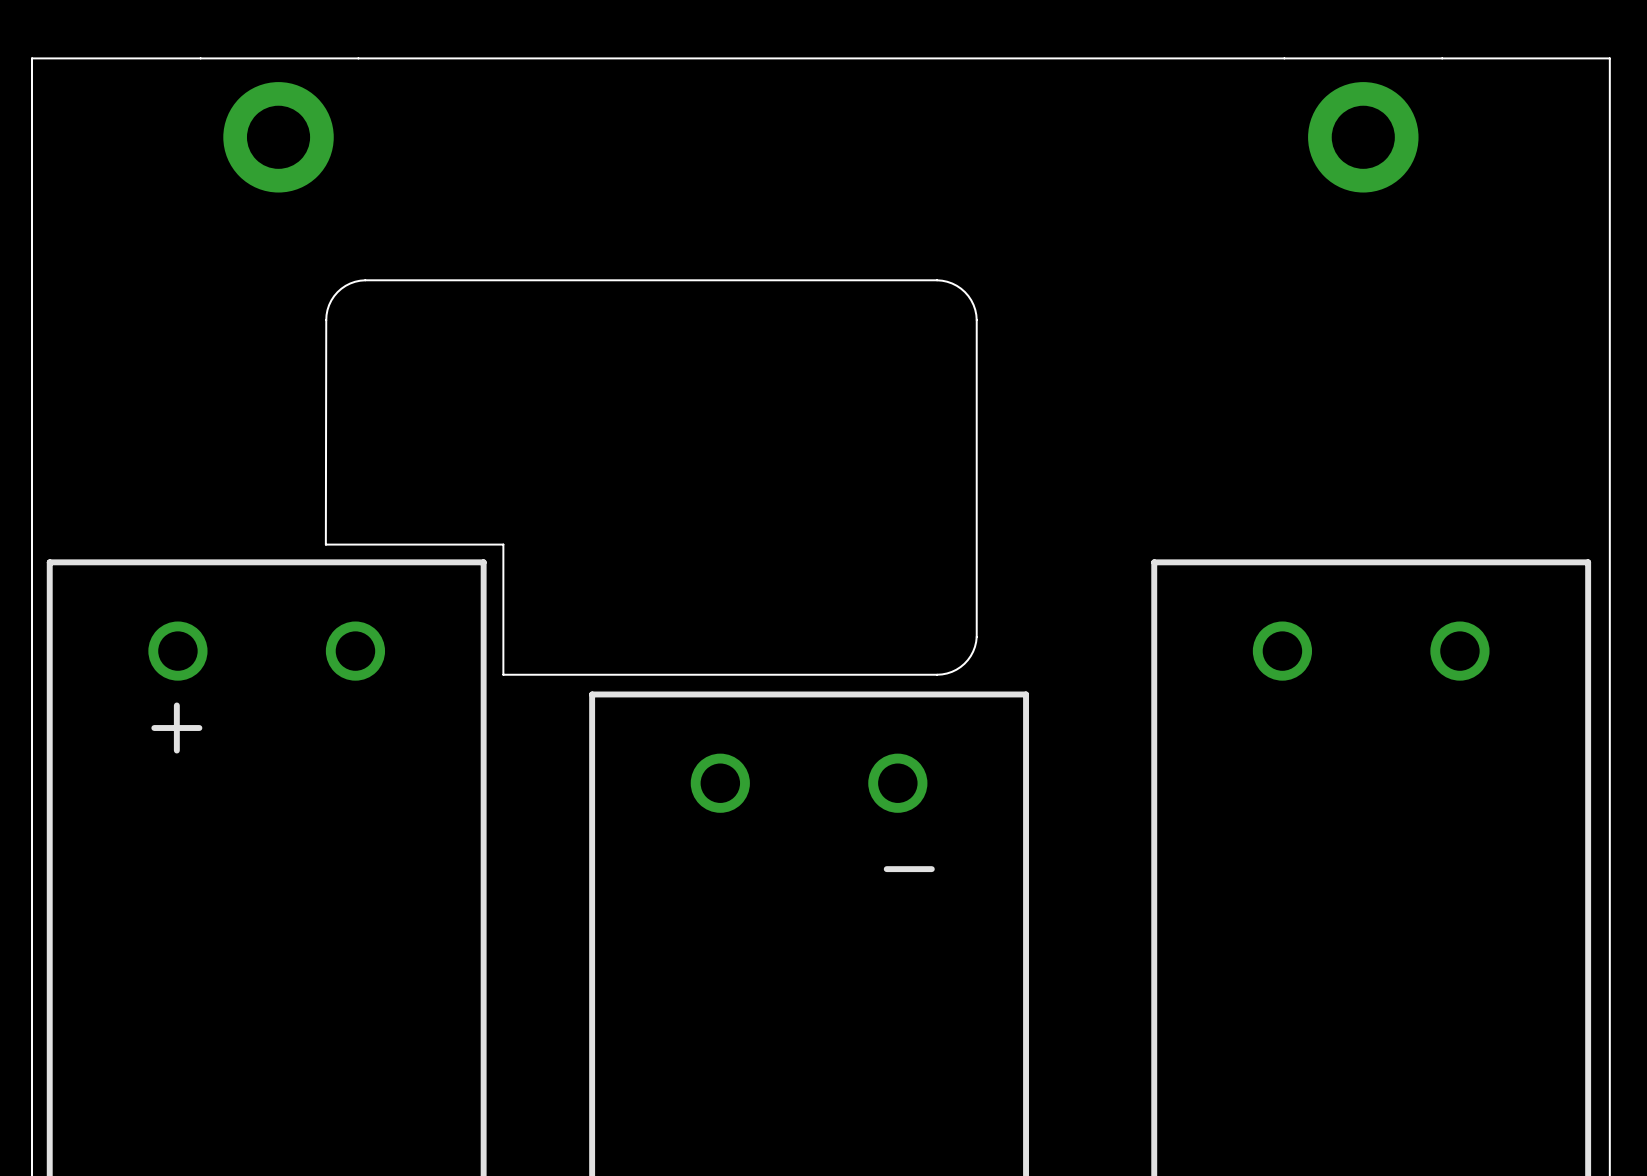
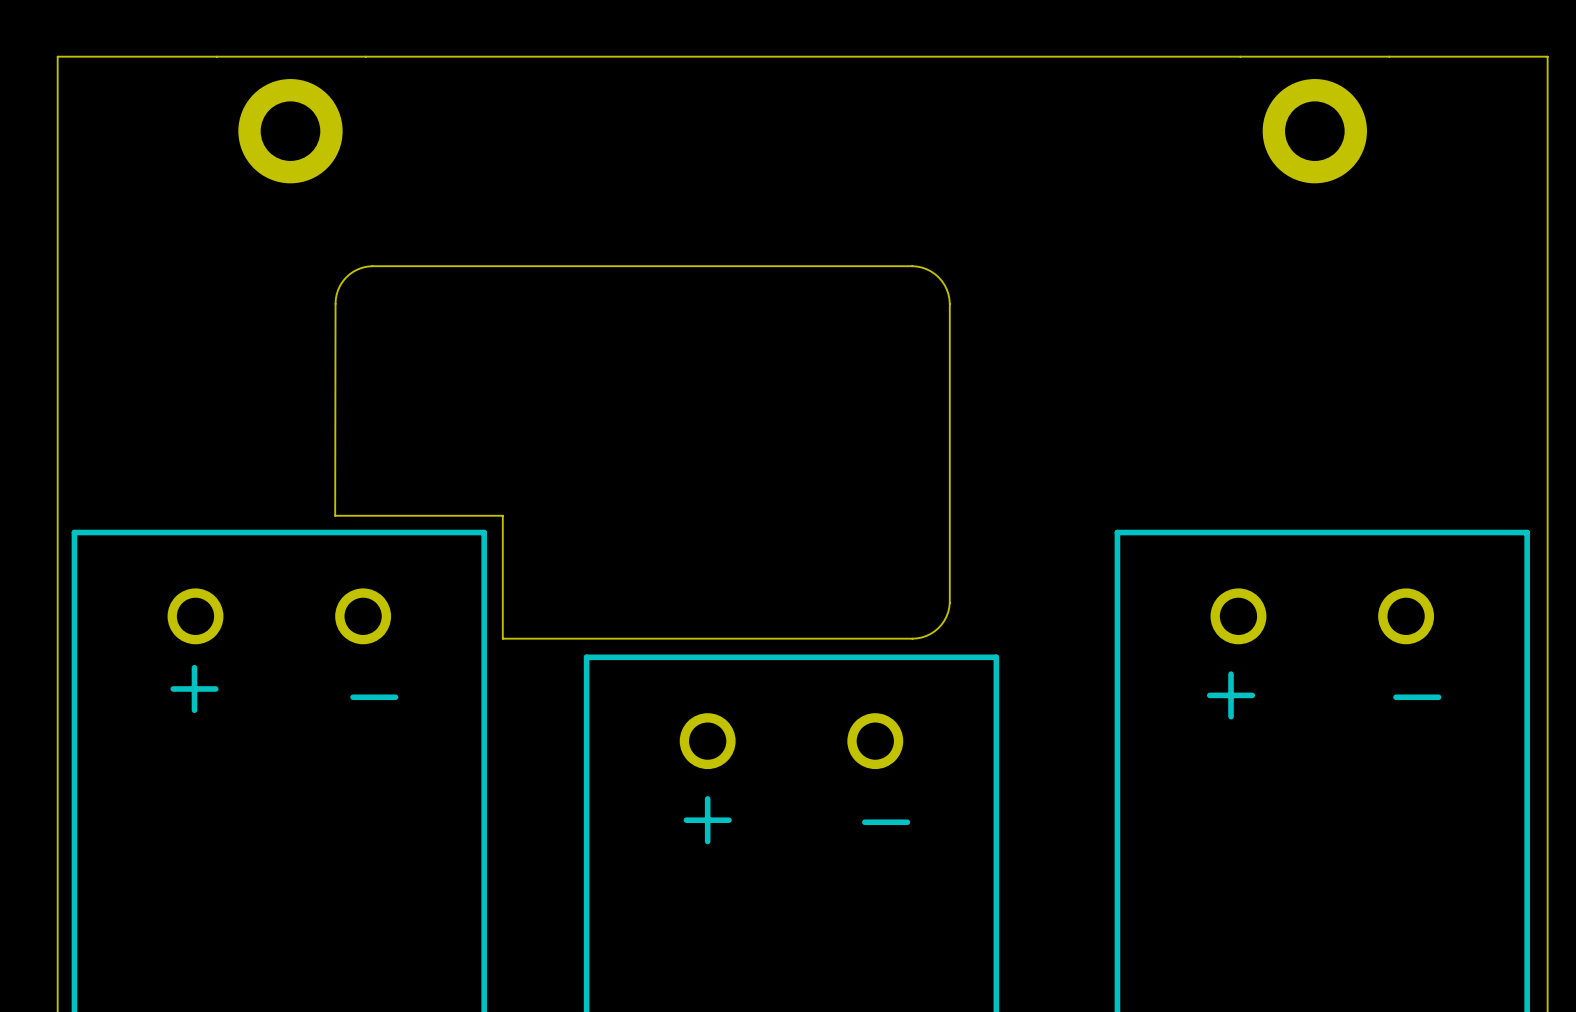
text: none -> + (1231, 695)
text: none -> - (374, 697)
text: none -> - (1417, 697)
text: none -> + (707, 820)

